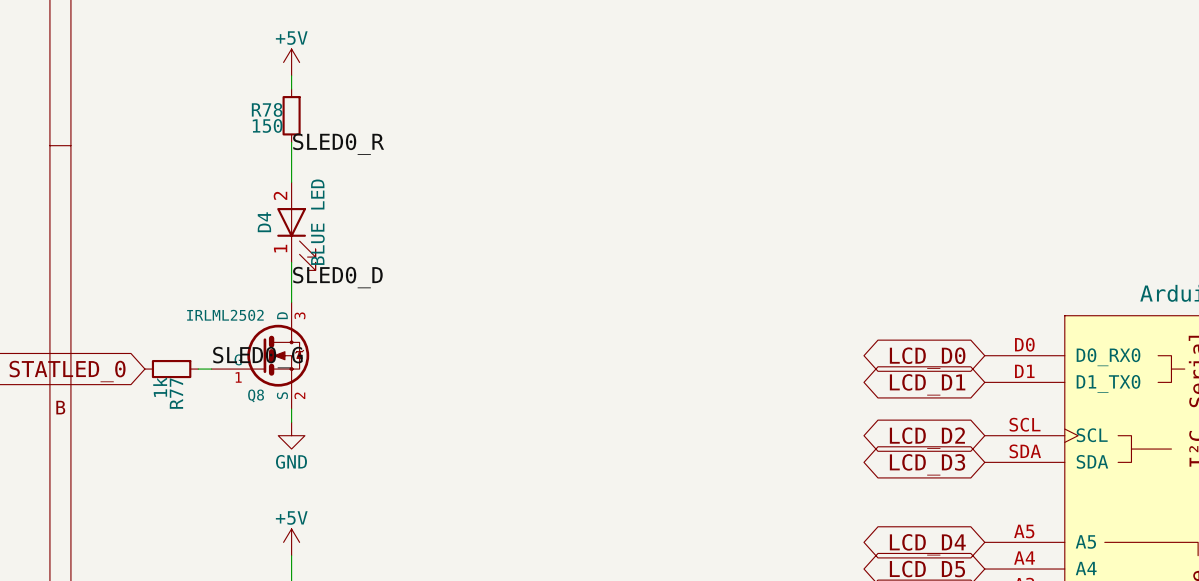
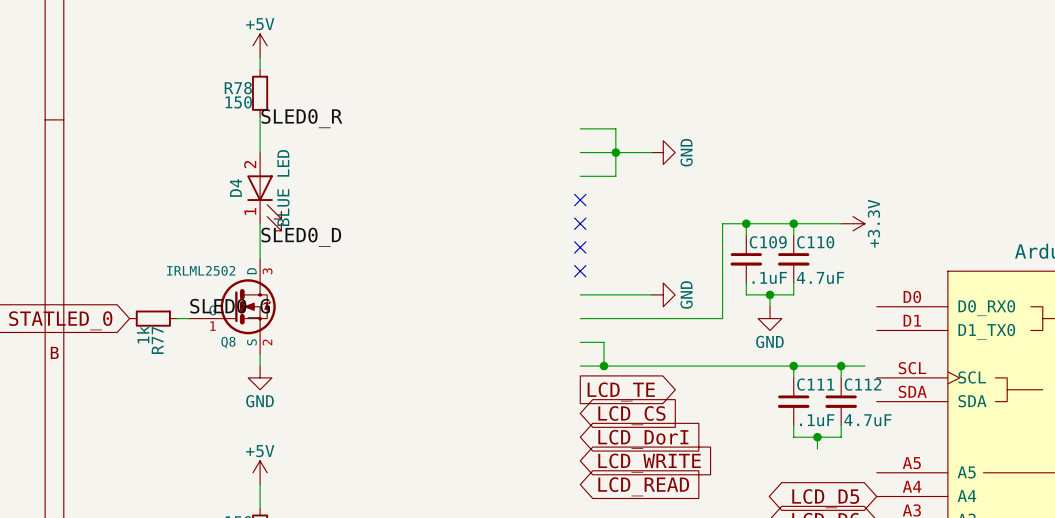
wire: none -> (580, 128) (615, 128) (615, 176) (580, 176)
wire: none -> (580, 152) (651, 152)
junction: none -> (615, 152)
power symbol: none -> GND (663, 152)
no-connect mark: none -> (580, 200)
no-connect mark: none -> (580, 223)
wire: none -> (746, 223) (746, 235)
junction: none -> (746, 223)
wire: none -> (793, 223) (793, 235)
junction: none -> (793, 223)
wire: none -> (841, 223) (722, 223) (722, 318) (580, 318)
power symbol: none -> +3.3V (853, 223)
no-connect mark: none -> (580, 247)
C109: none -> .1uF (746, 259)
C110: none -> 4.7uF (793, 259)
no-connect mark: none -> (580, 271)
wire: none -> (746, 283) (746, 294) (793, 294) (793, 283)
wire: none -> (580, 294) (651, 294)
power symbol: none -> GND (663, 294)
wire: none -> (770, 294) (770, 306)
junction: none -> (770, 294)
global label: LCD_D0 (927, 358) -> none
power symbol: none -> GND (770, 318)
global label: LCD_D1 (927, 384) -> none
wire: none -> (580, 342) (603, 342) (603, 366)
wire: none -> (580, 366) (864, 366)
junction: none -> (603, 366)
junction: none -> (793, 366)
wire: none -> (841, 366) (841, 377)
junction: none -> (841, 366)
global label: LCD_D2 (927, 438) -> none
global label: none -> LCD_TE (621, 391)
C111: none -> .1uF (793, 401)
C112: none -> 4.7uF (841, 401)
global label: LCD_D3 (927, 464) -> none
global label: none -> LCD_CS (631, 415)
wire: none -> (793, 425) (793, 437) (841, 437) (841, 425)
wire: none -> (817, 437) (817, 449)
junction: none -> (817, 437)
global label: none -> LCD_DorI (643, 439)
global label: none -> LCD_WRITE (649, 463)
global label: LCD_D4 (927, 544) -> none
global label: none -> LCD_READ (643, 486)

